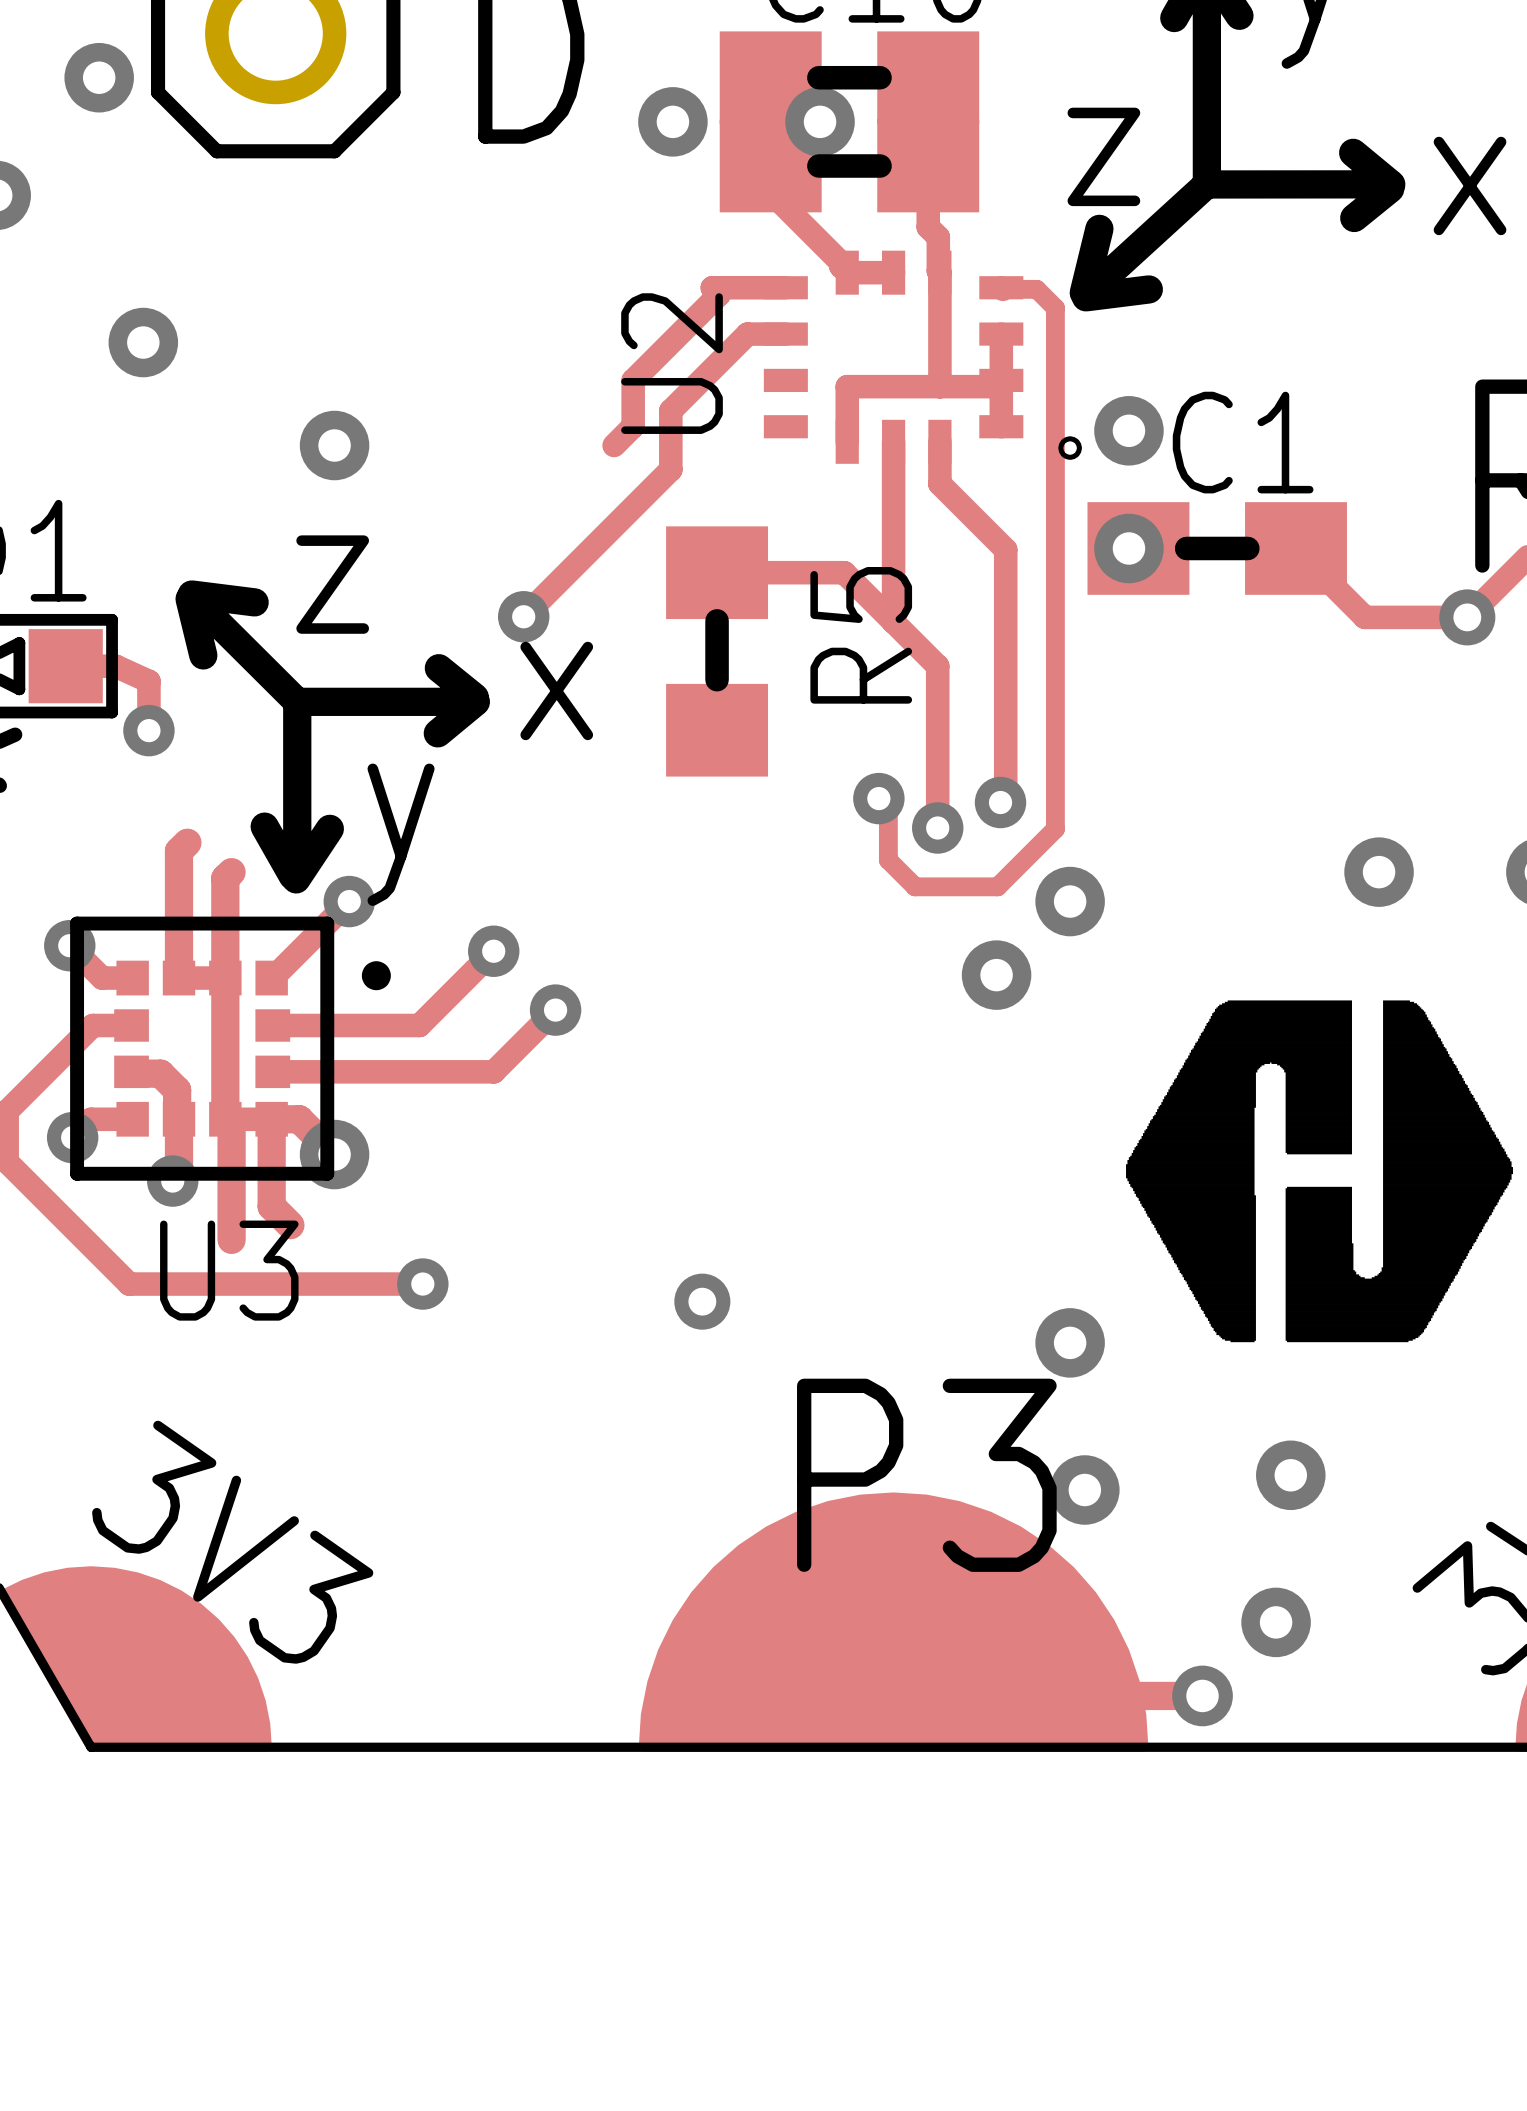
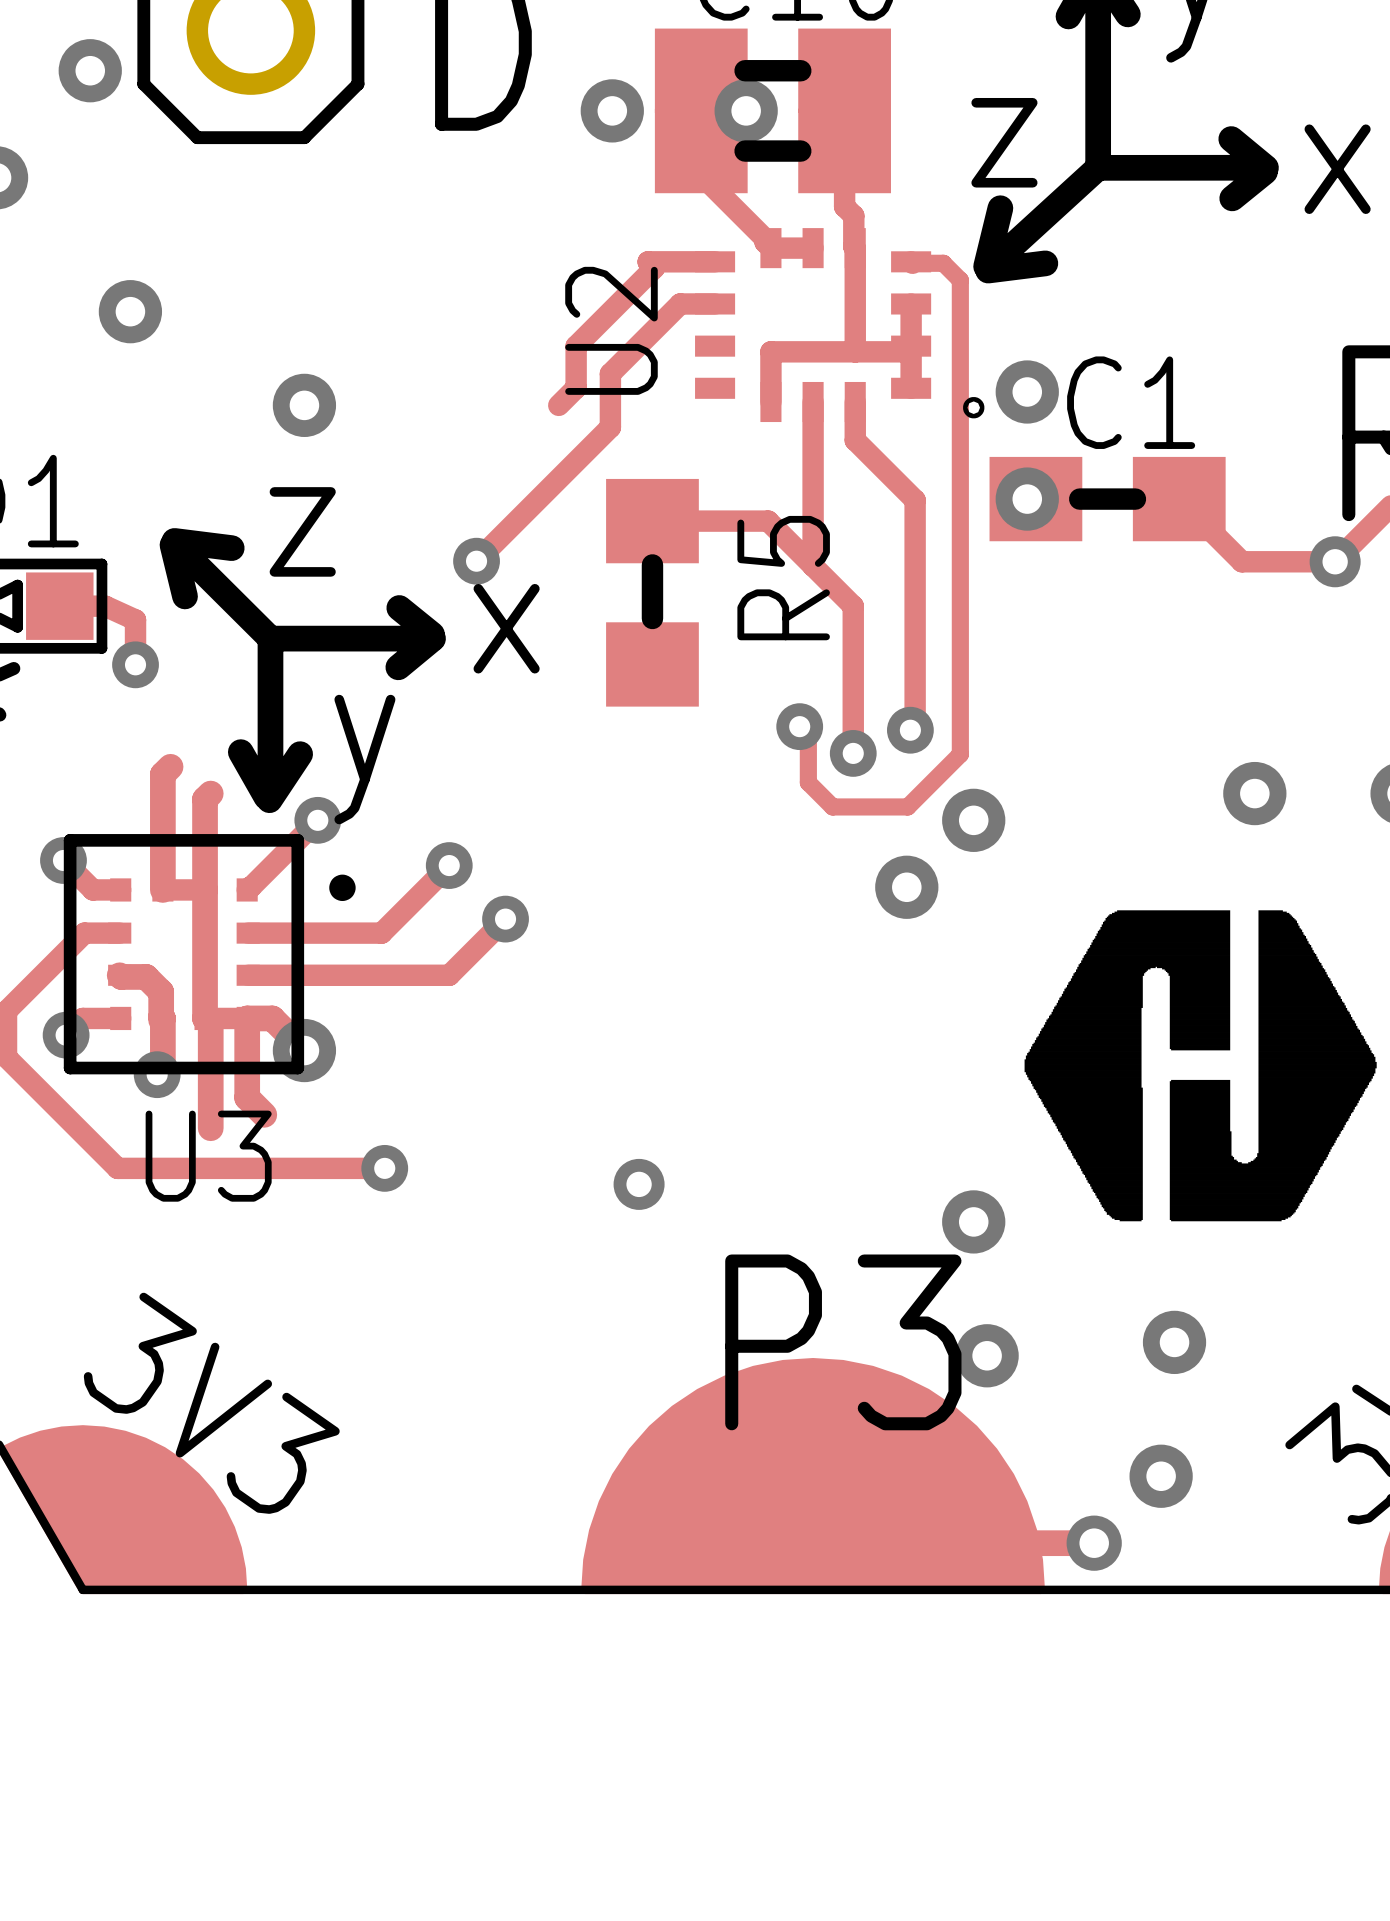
U3 footprint: [70, 916, 391, 1181] -> [63, 834, 356, 1075]

